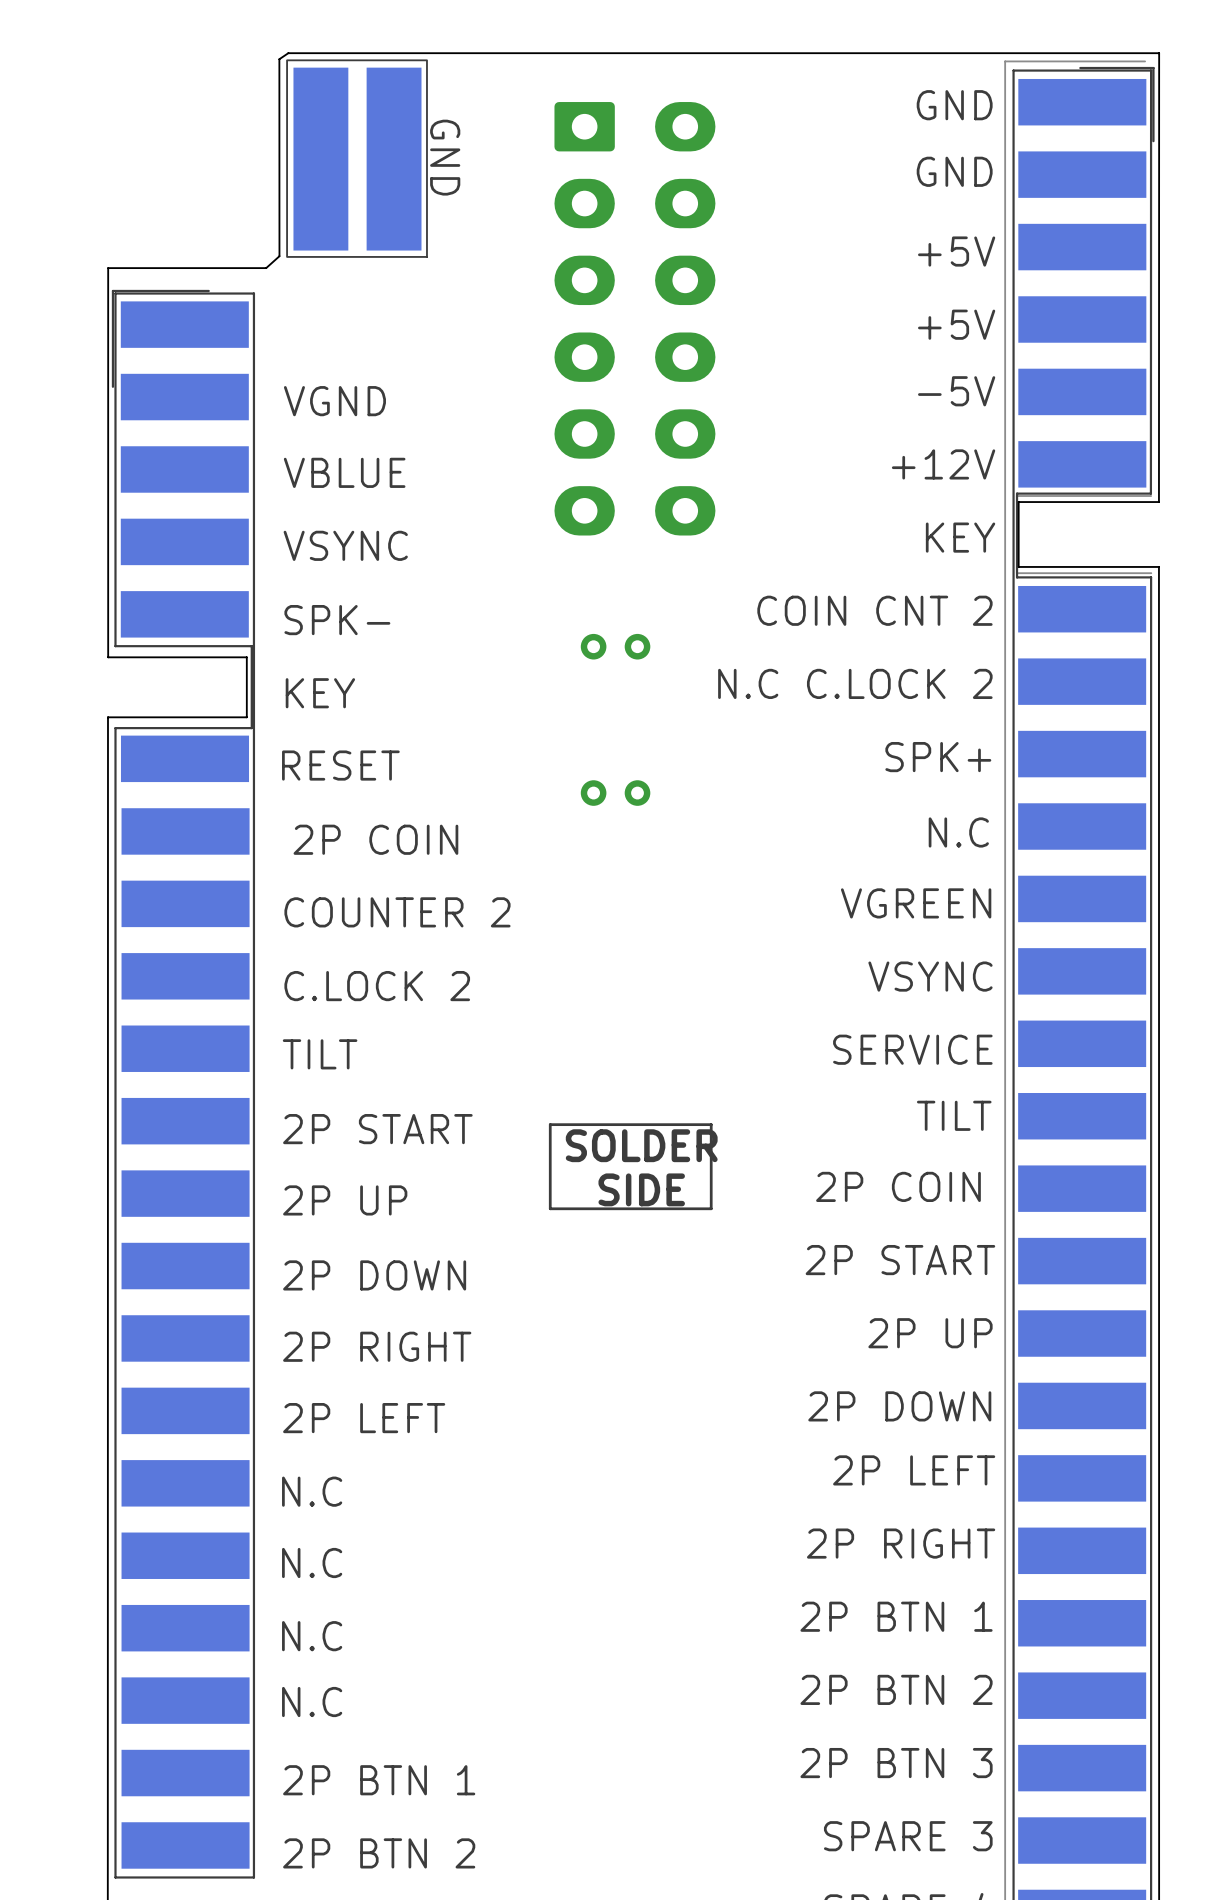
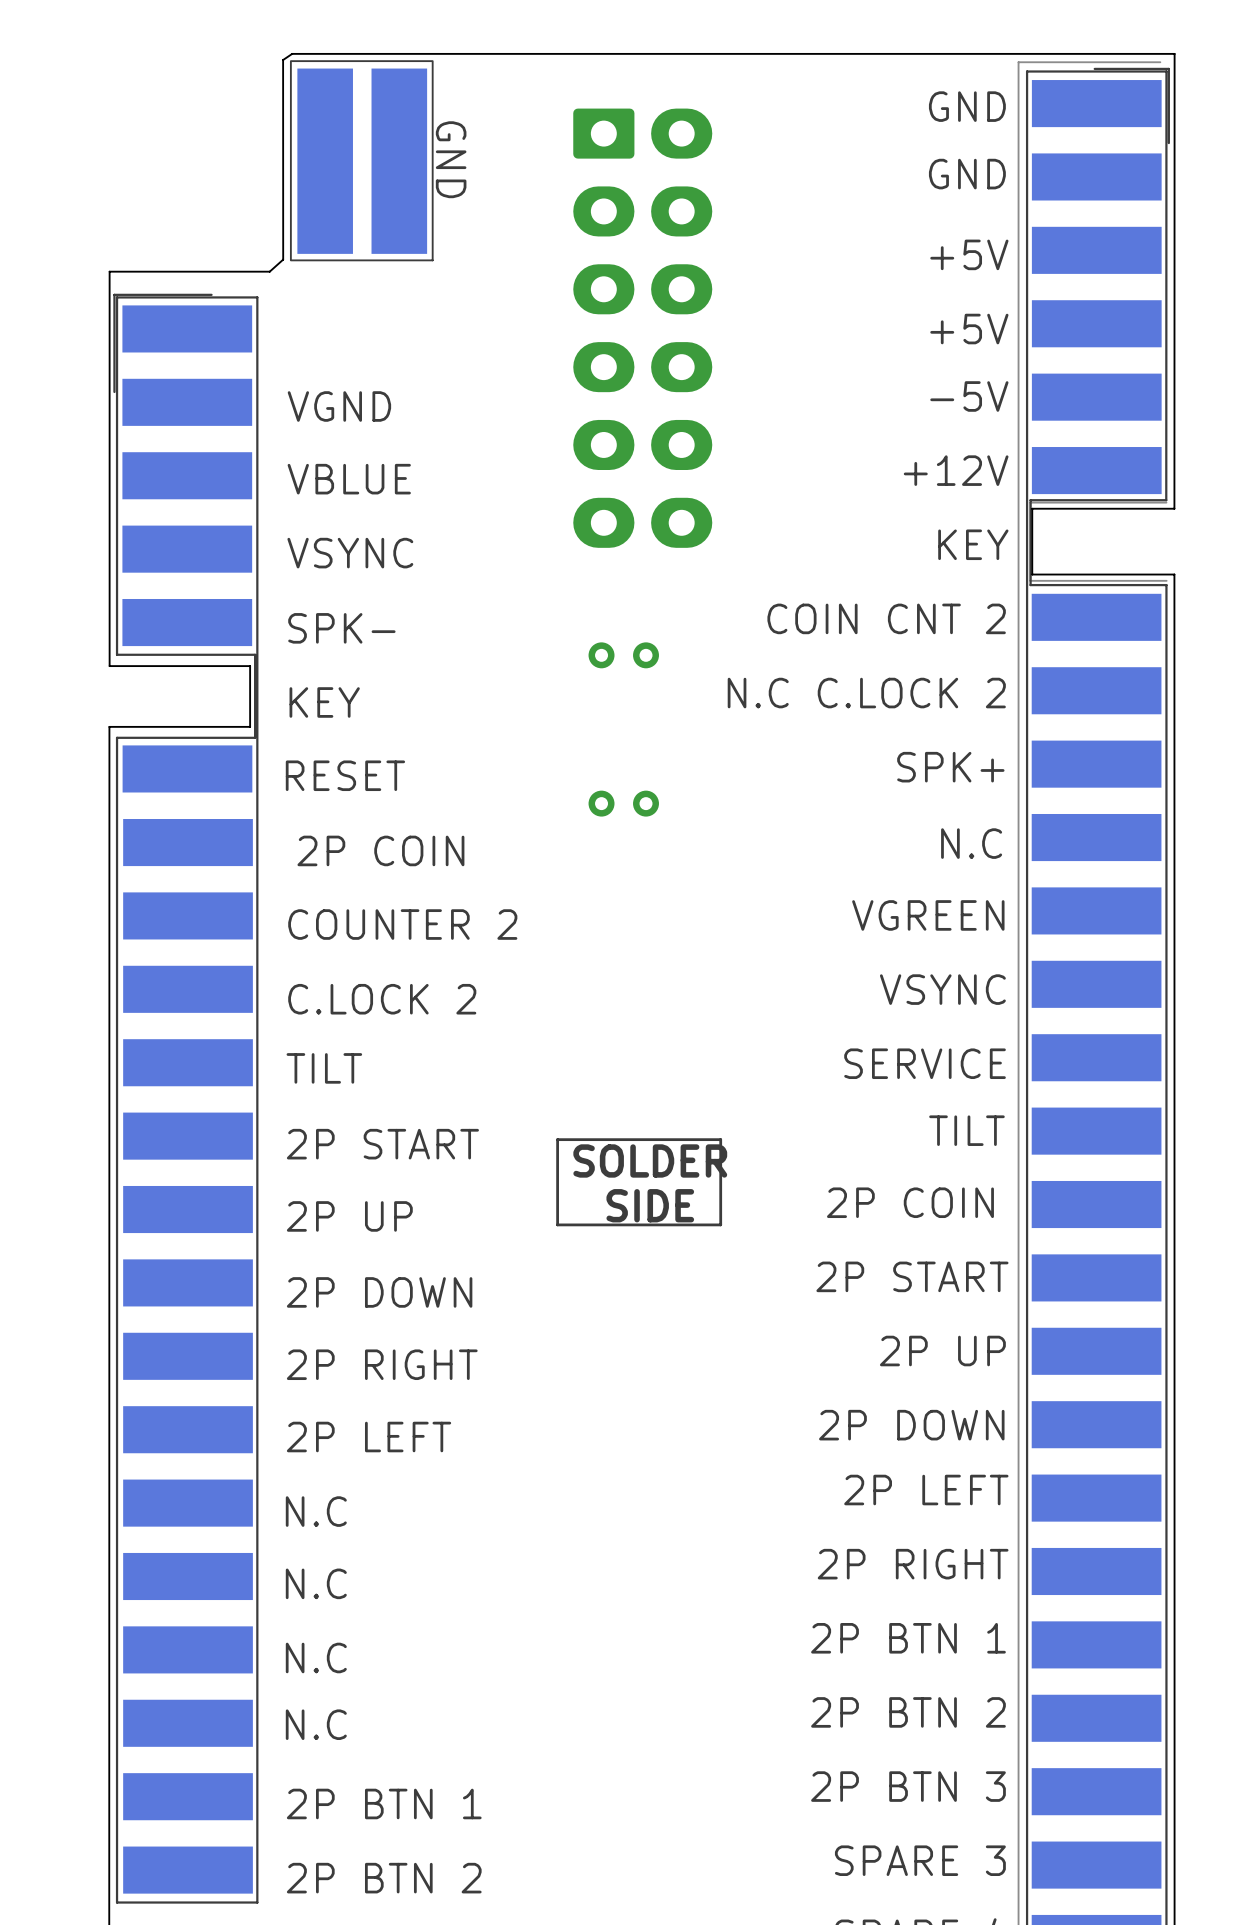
part footprint: [554, 102, 716, 536] -> [573, 108, 713, 548]

